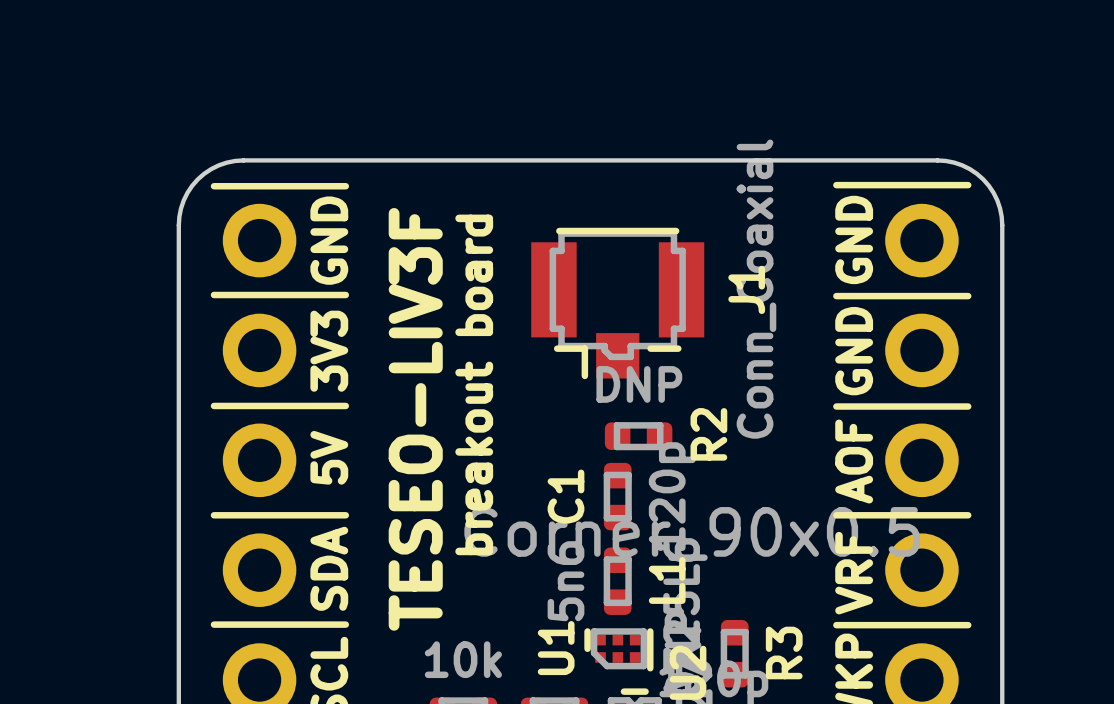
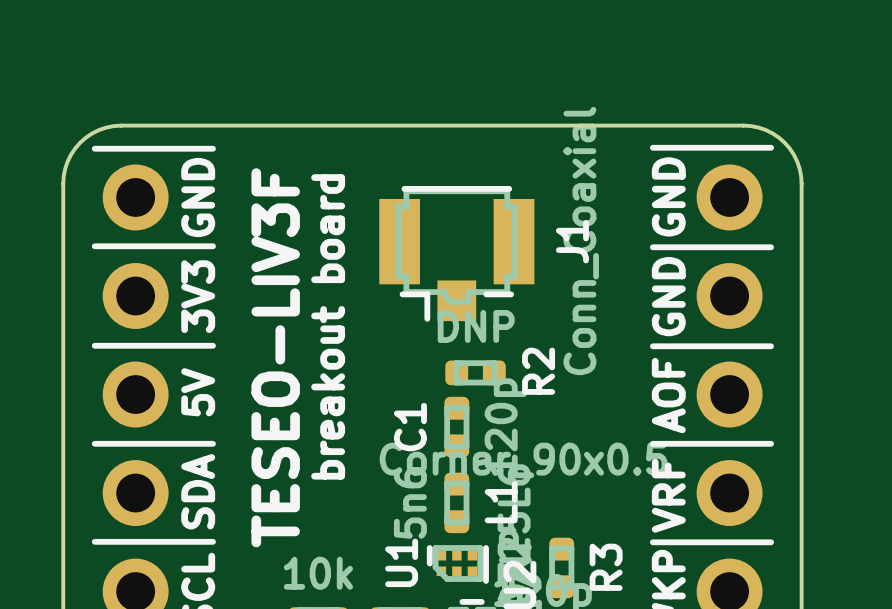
drawing shape: [464, 507, 920, 561] -> [379, 442, 668, 479]

